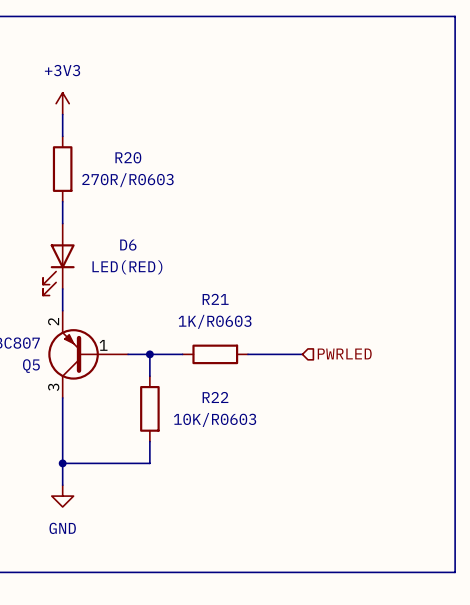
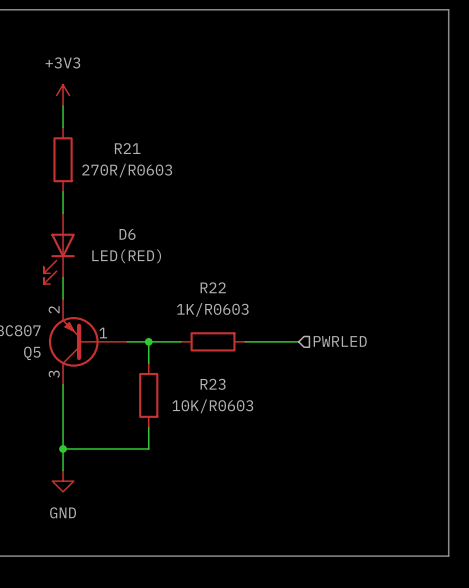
R20 name: R20 (128, 157) -> R21 (127, 148)
R21 name: R21 (215, 299) -> R22 (213, 287)
R22 name: R22 (215, 397) -> R23 (213, 384)

